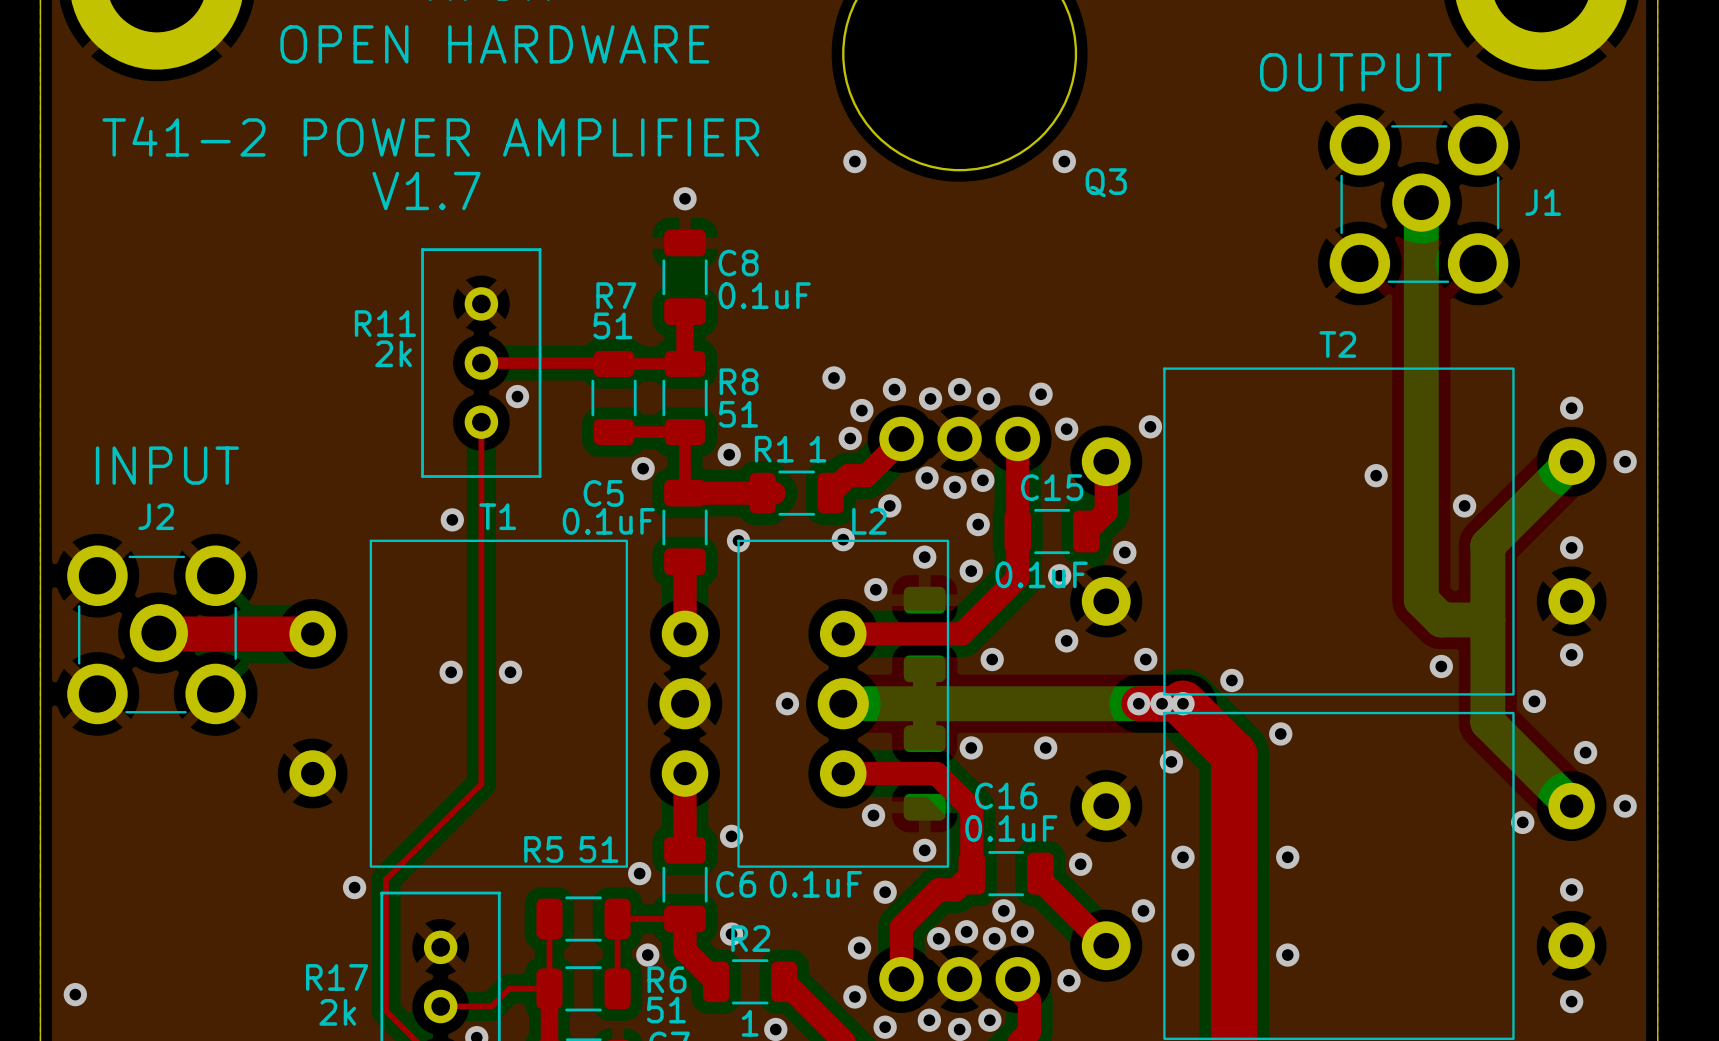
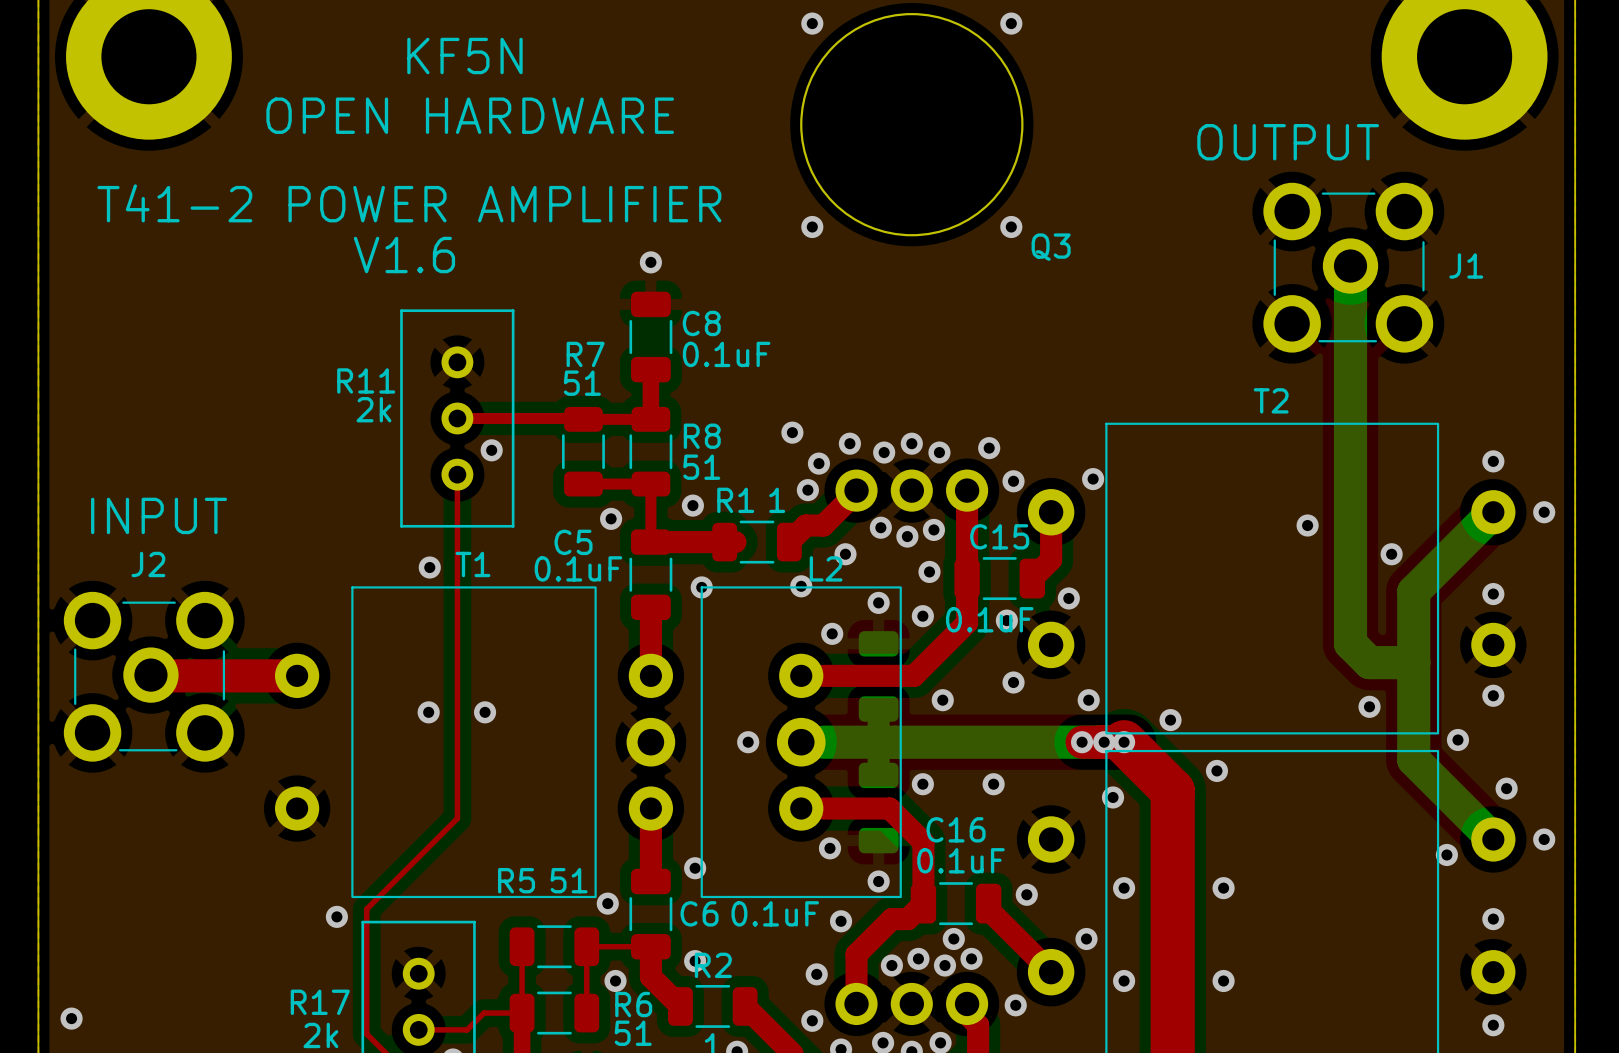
text: V1.7 (426, 190) -> V1.6 (404, 255)

